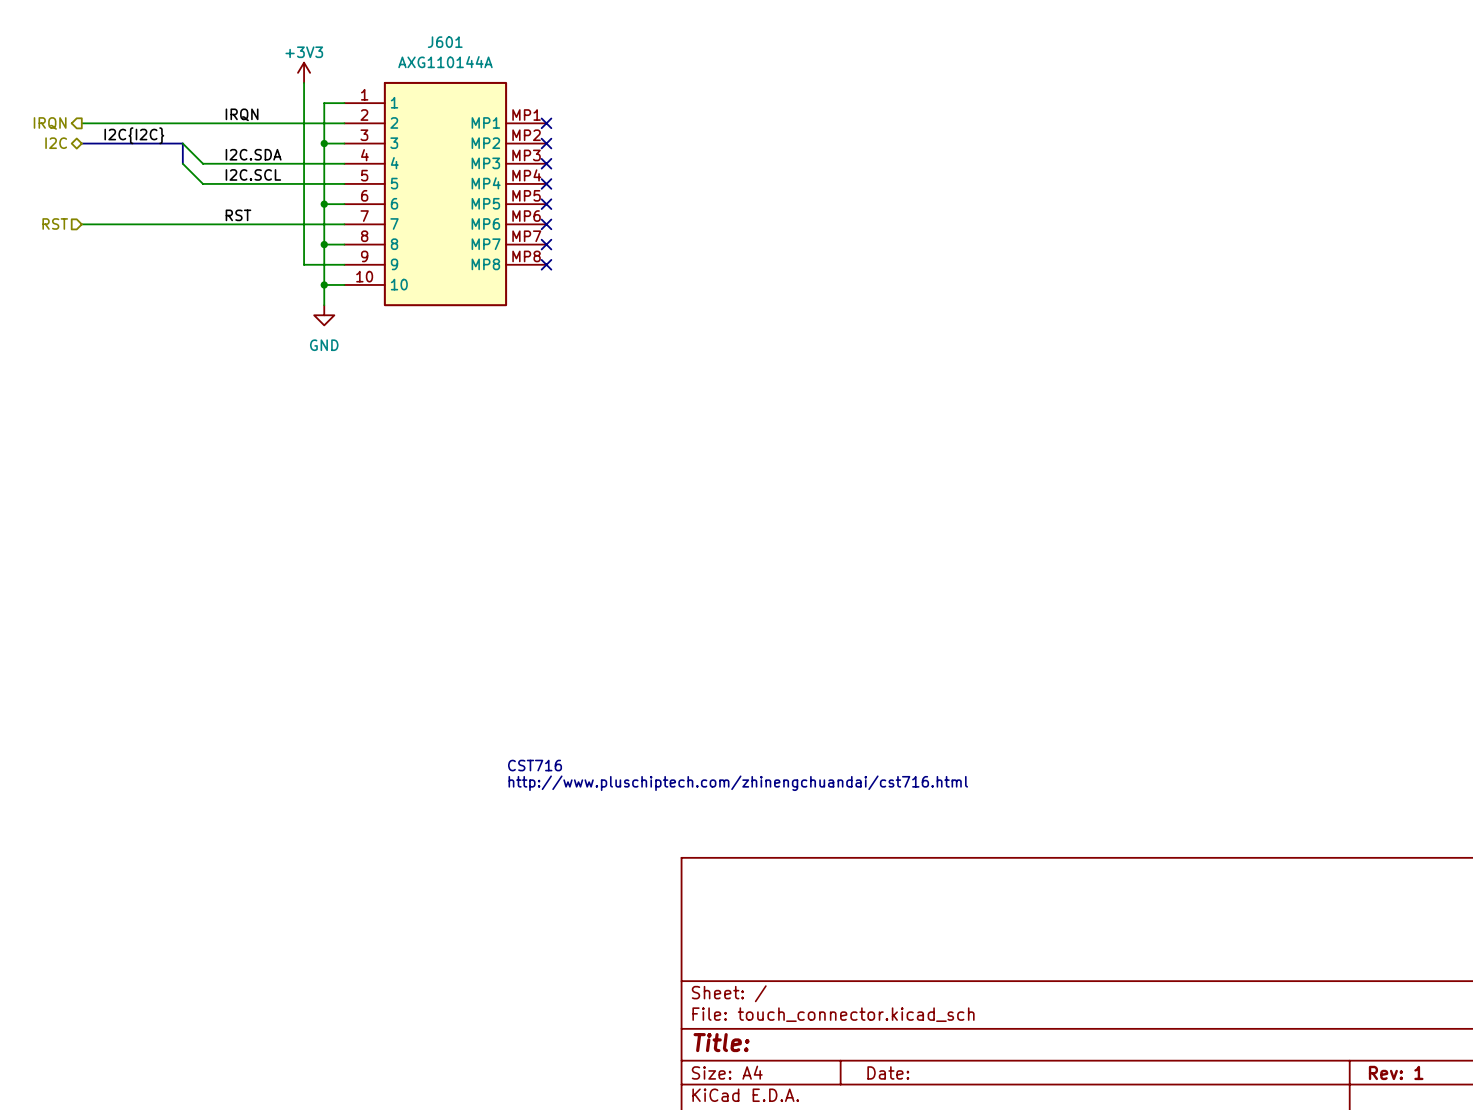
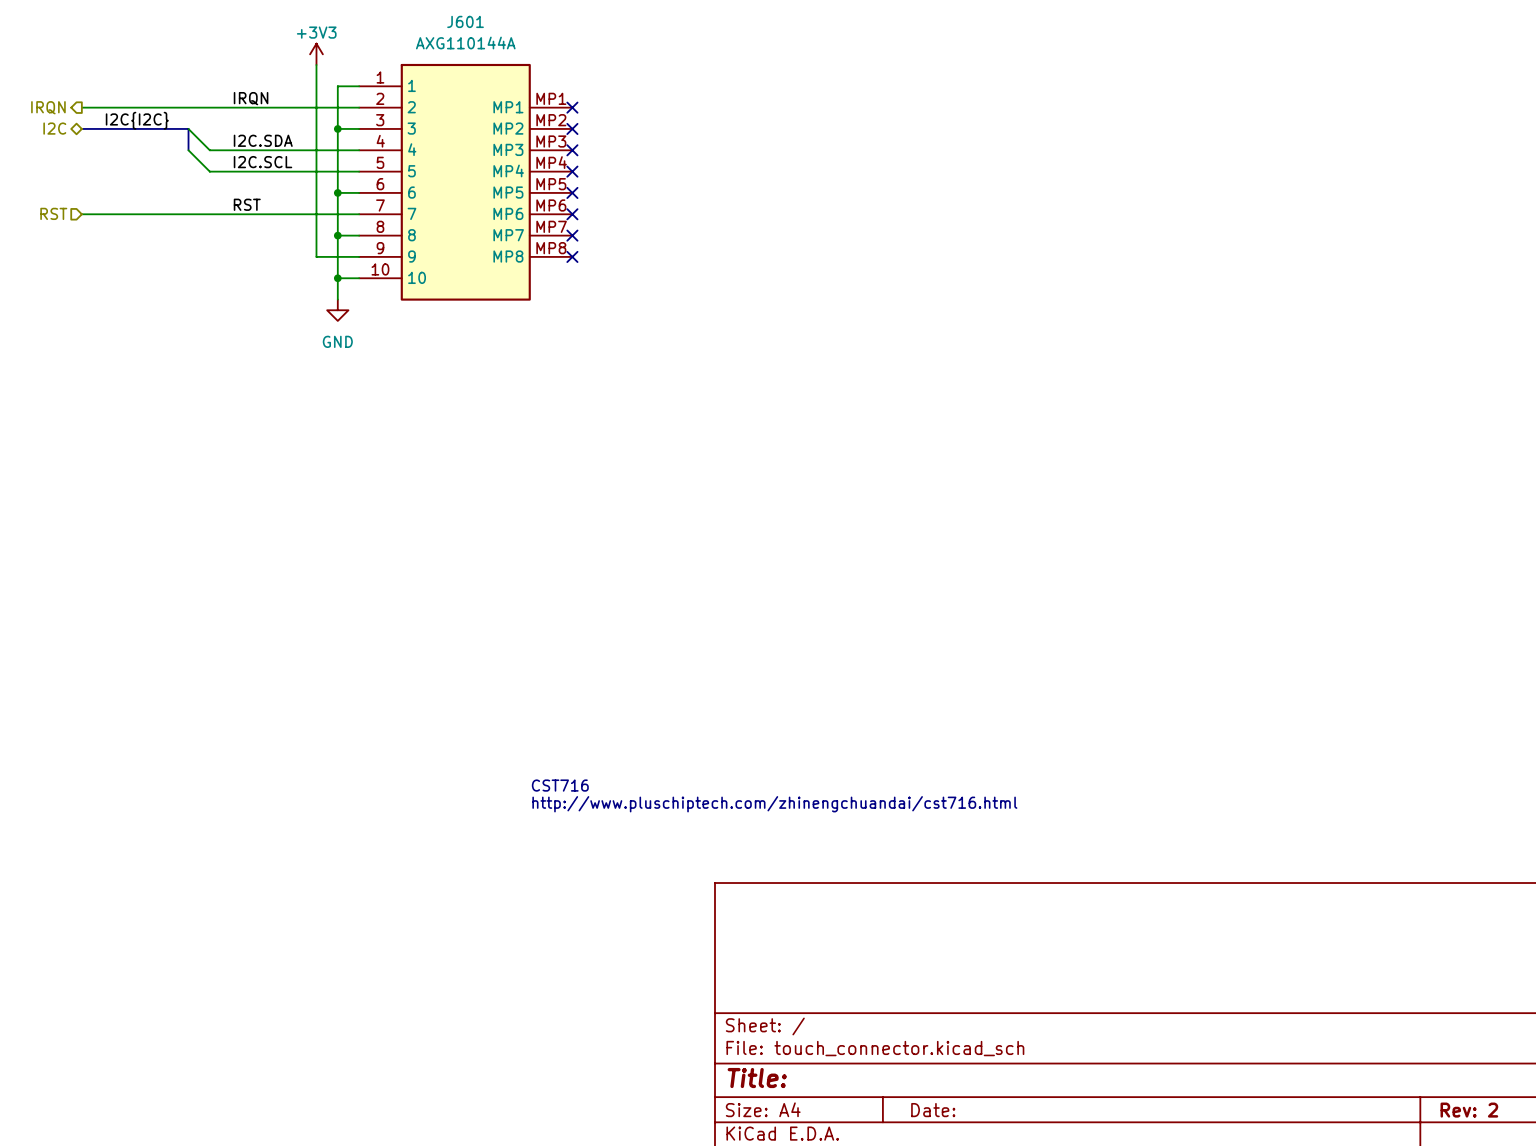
title block: Rev: 1 (1396, 1072) -> Rev: 2 (1469, 1110)

